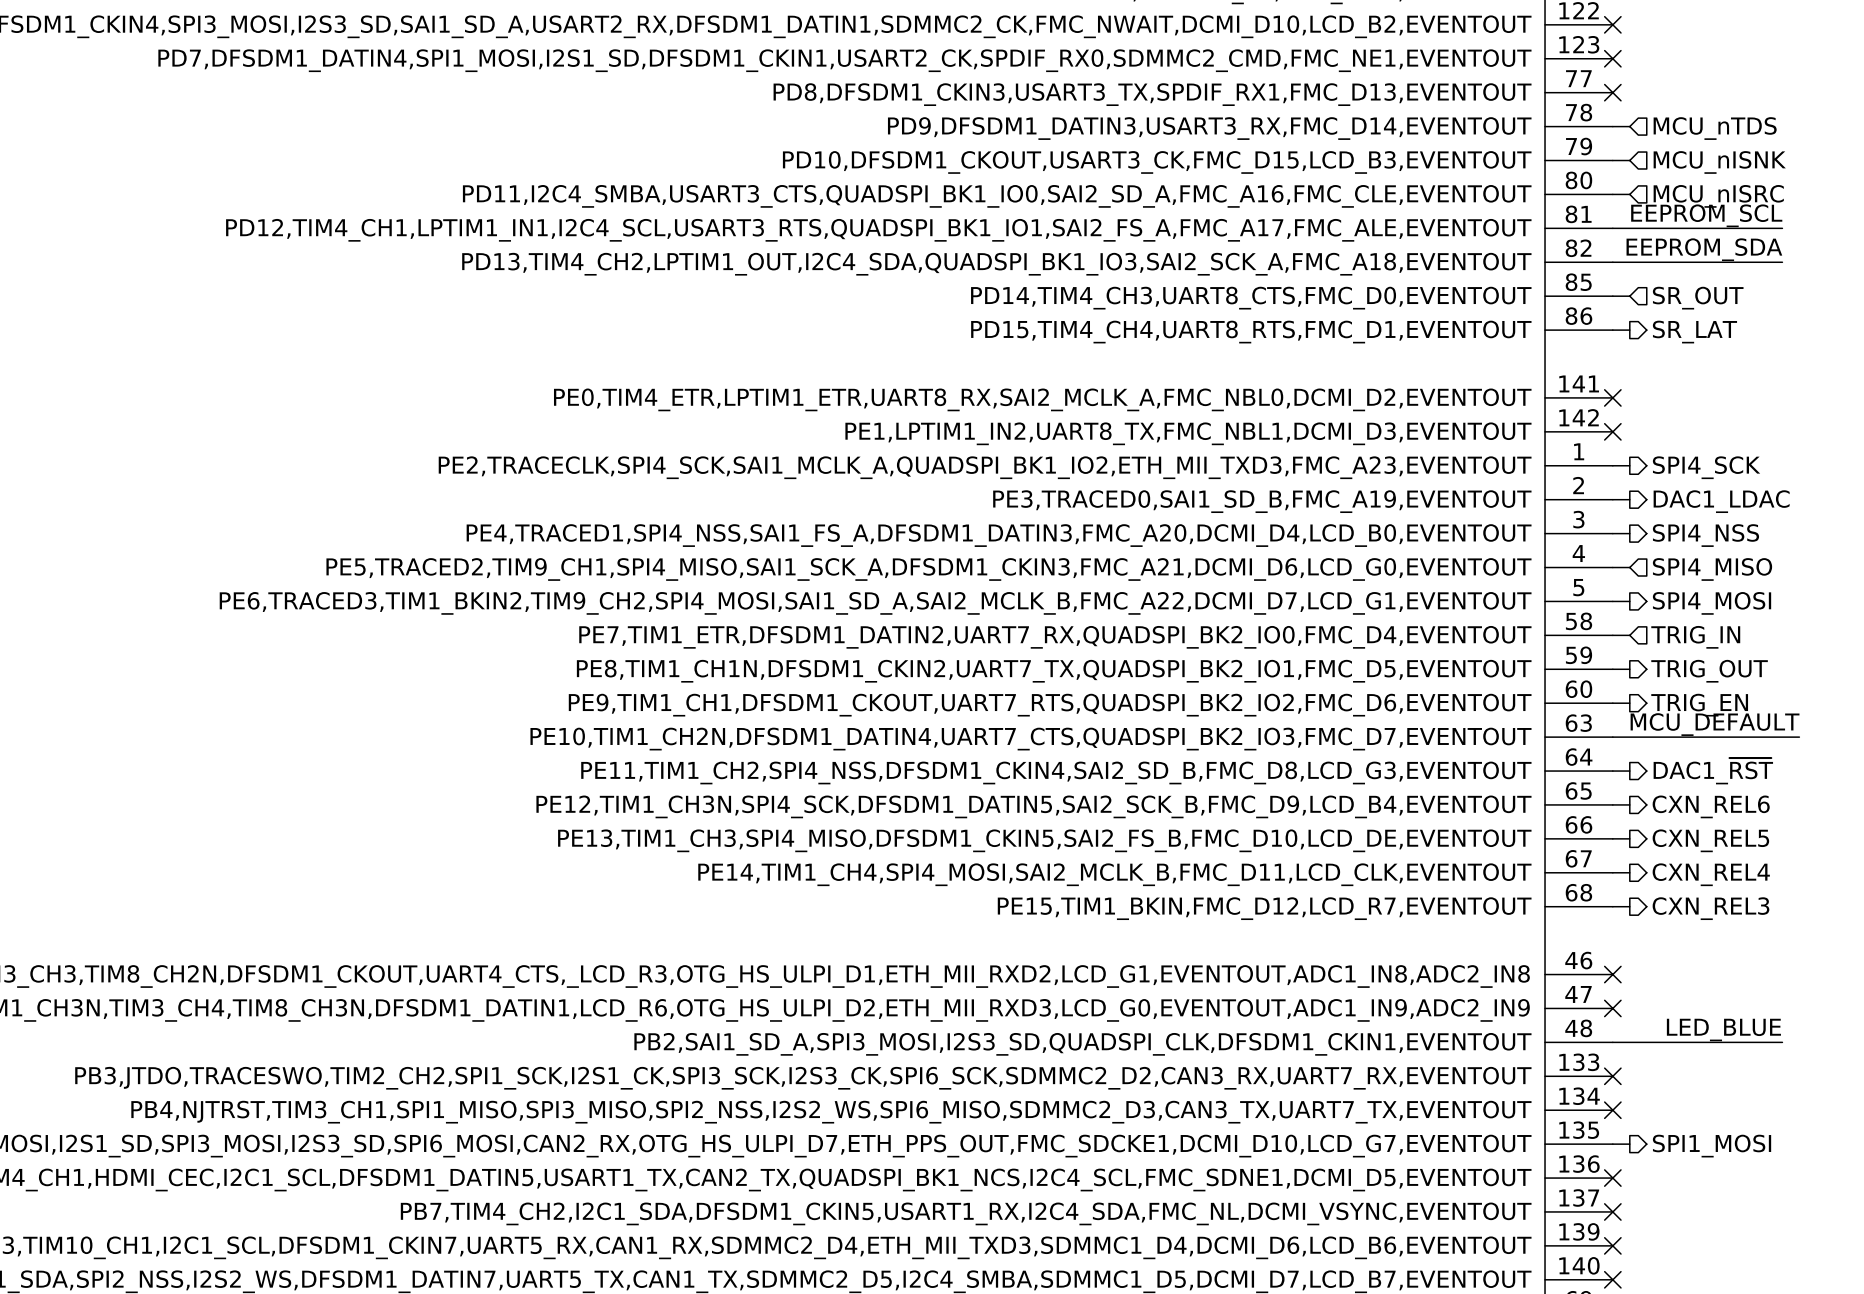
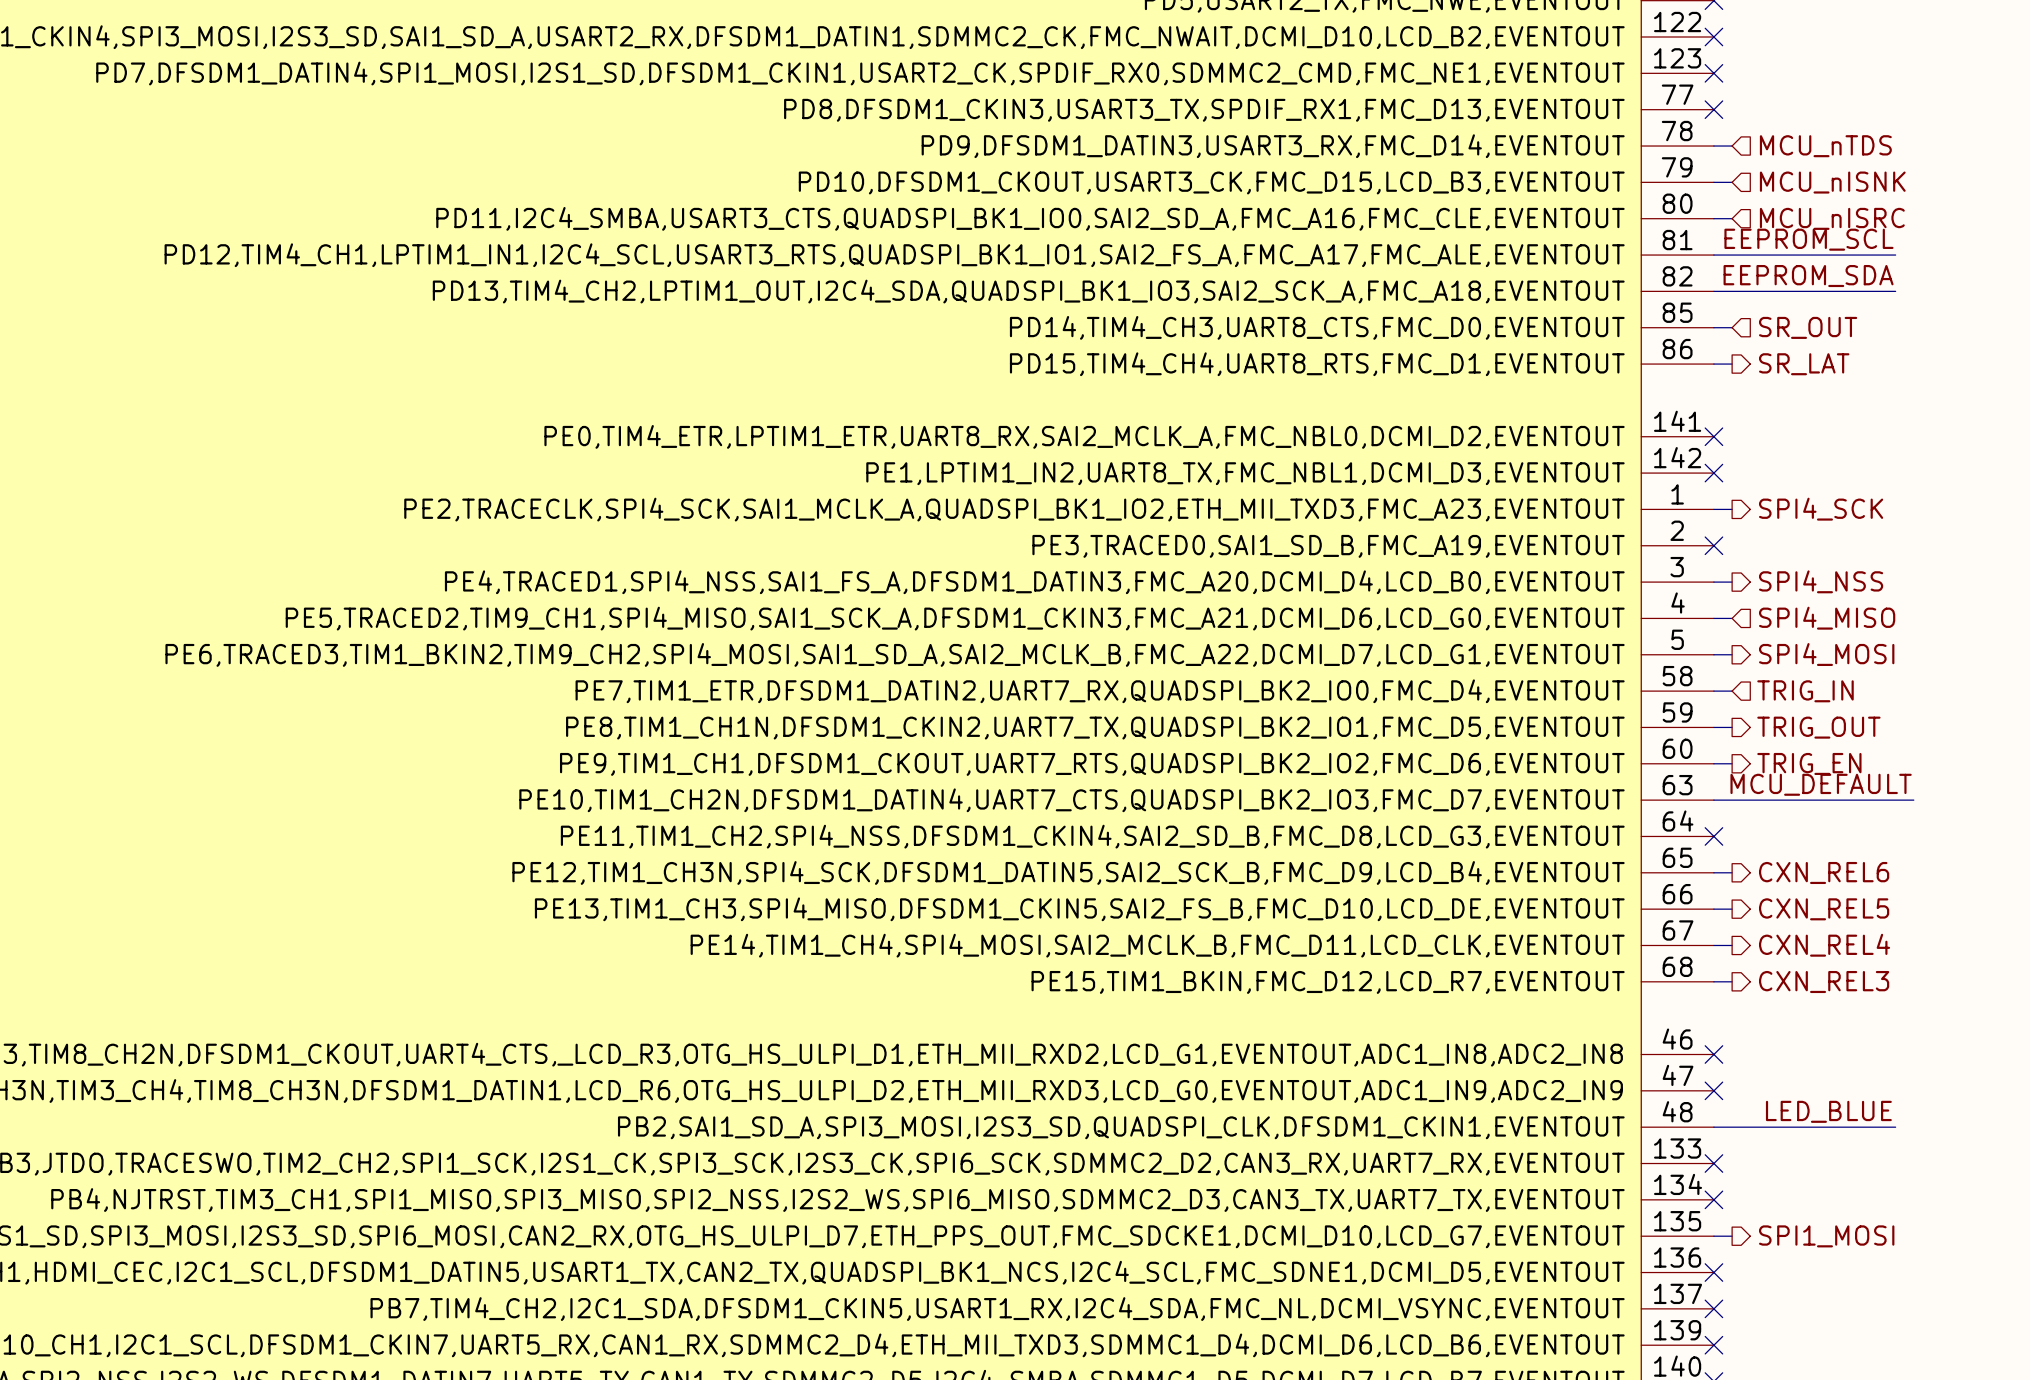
wire: (1612, 499) (1629, 499) -> none
no-connect mark: none -> (1713, 545)
hierarchical label: DAC1_LDAC (1721, 501) -> none
wire: (1612, 771) (1629, 771) -> none
no-connect mark: none -> (1713, 836)
hierarchical label: DAC1_~{RST} (1713, 771) -> none

